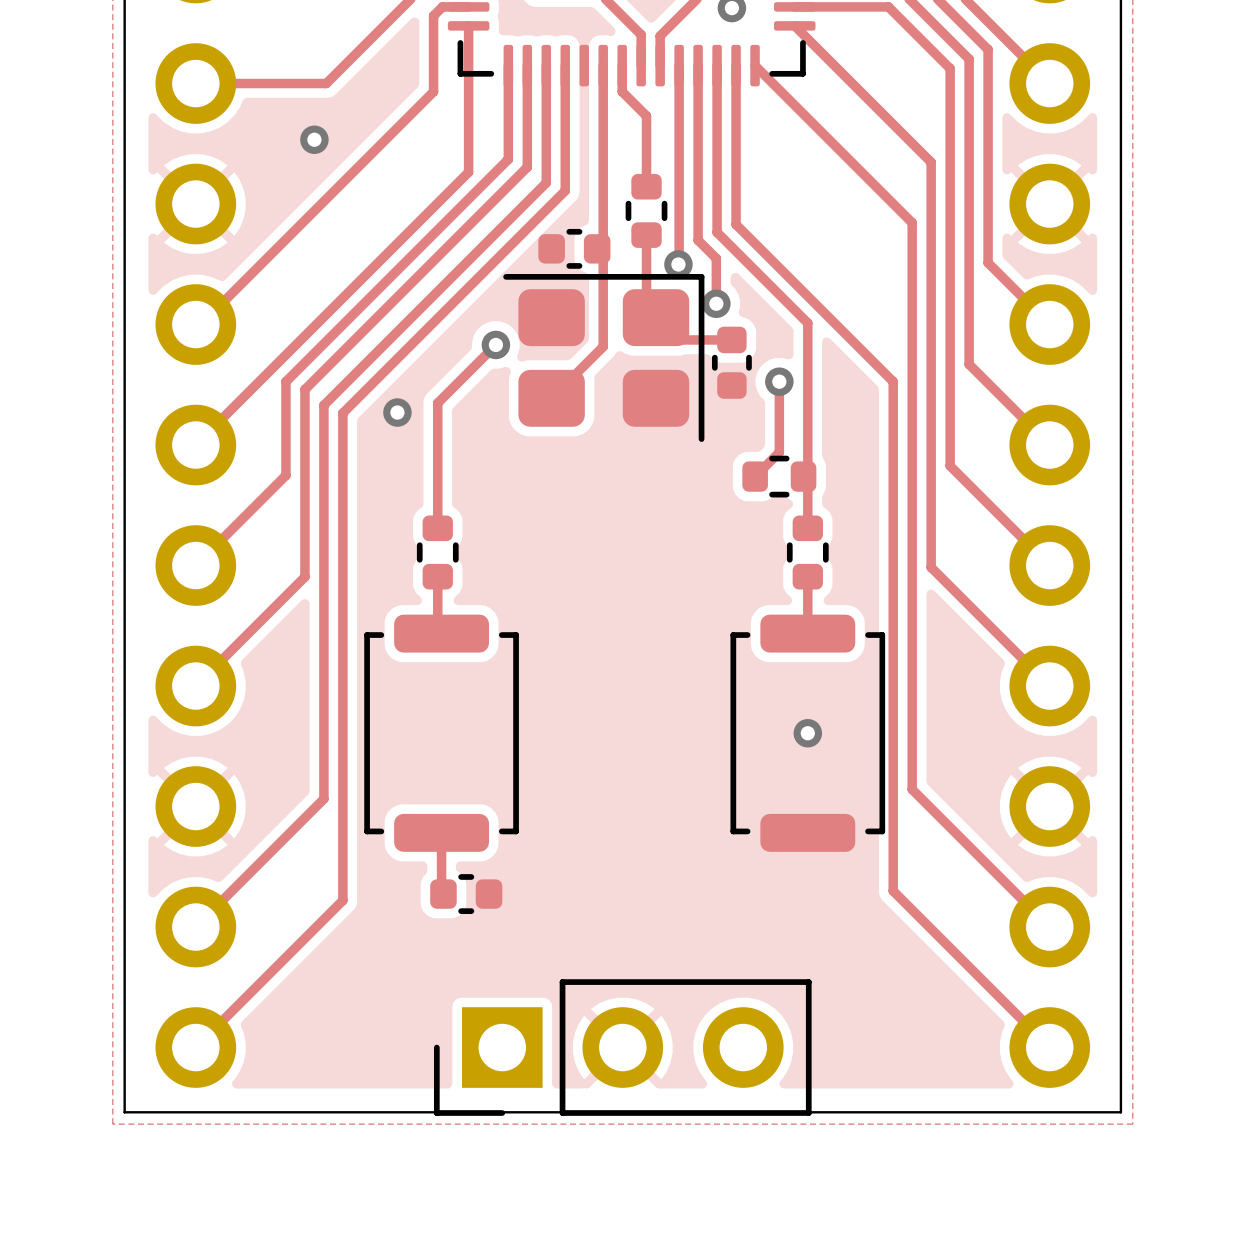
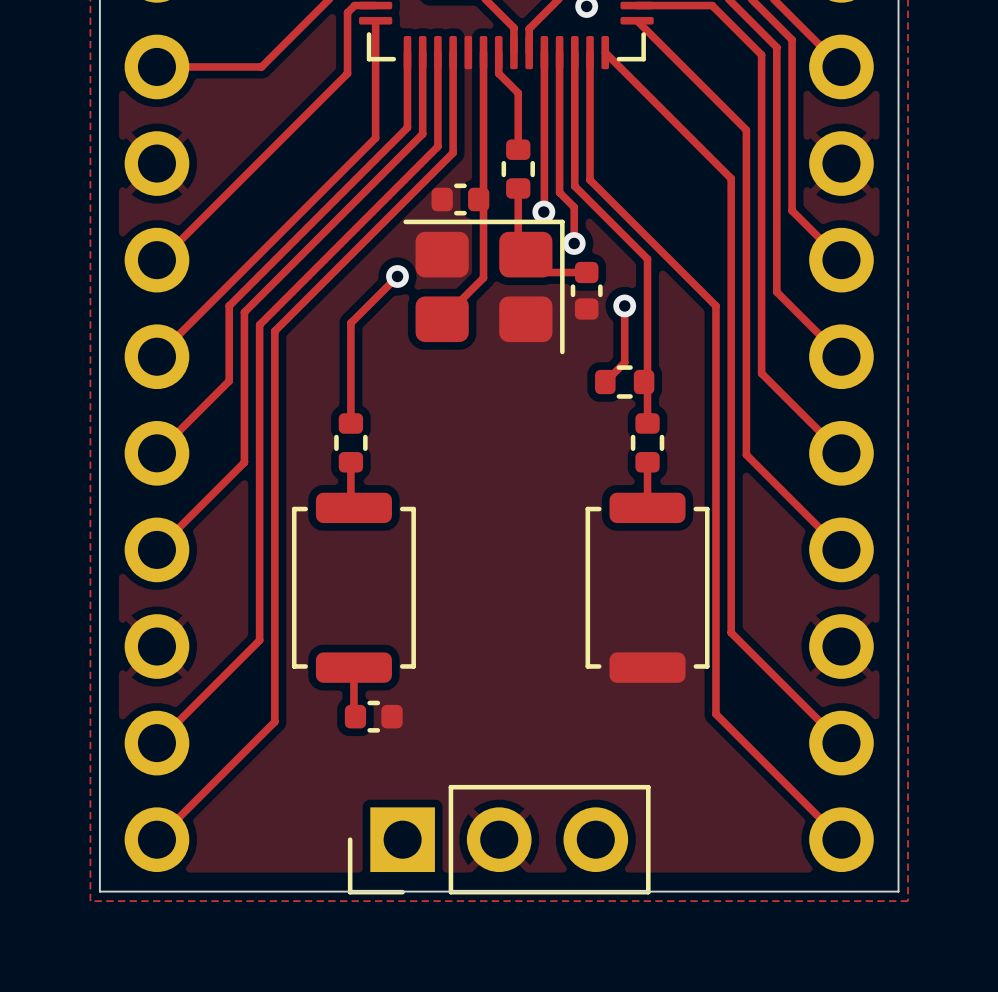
via: (314, 139) -> none
via: (397, 412) -> none
via: (807, 733) -> none

